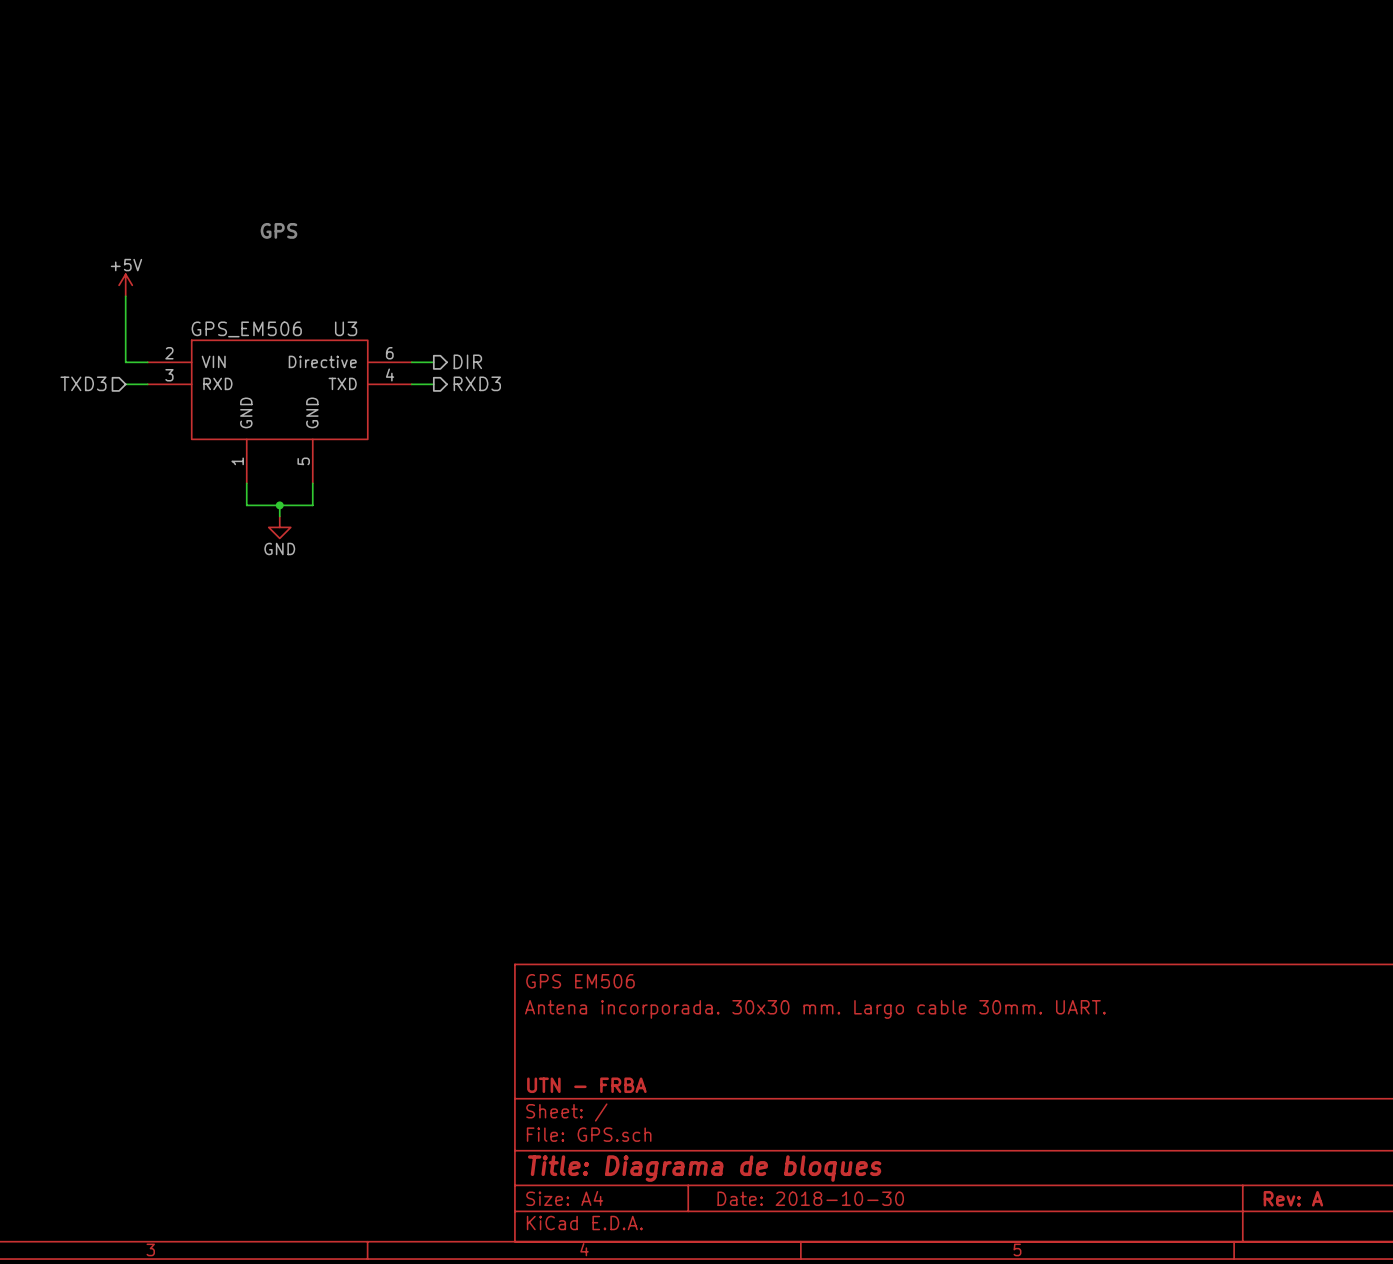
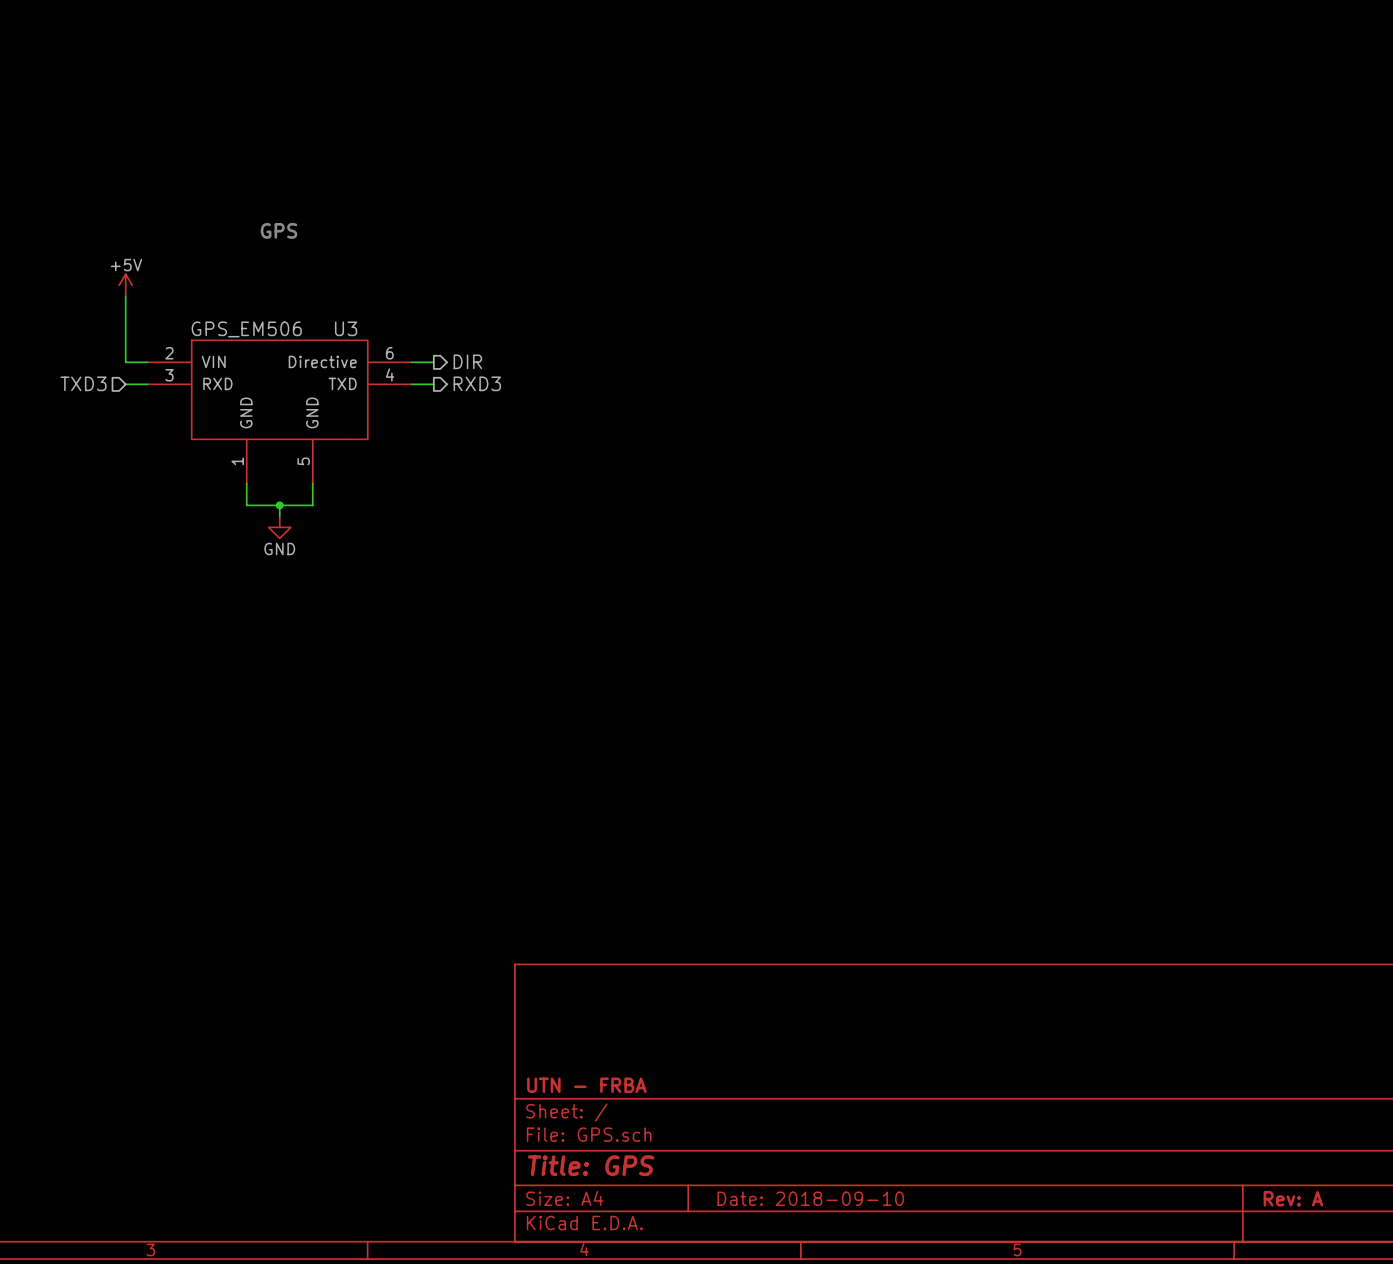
title block: GPS EM506 (580, 981) -> none
title block: Antena incorporada. 30x30 mm. Largo cable 30mm. UART. (815, 1009) -> none
title block: Title: Diagrama de bloques (704, 1168) -> Title: GPS (591, 1165)
title block: Date: 2018-10-30 (810, 1198) -> Date: 2018-09-10 (810, 1198)

